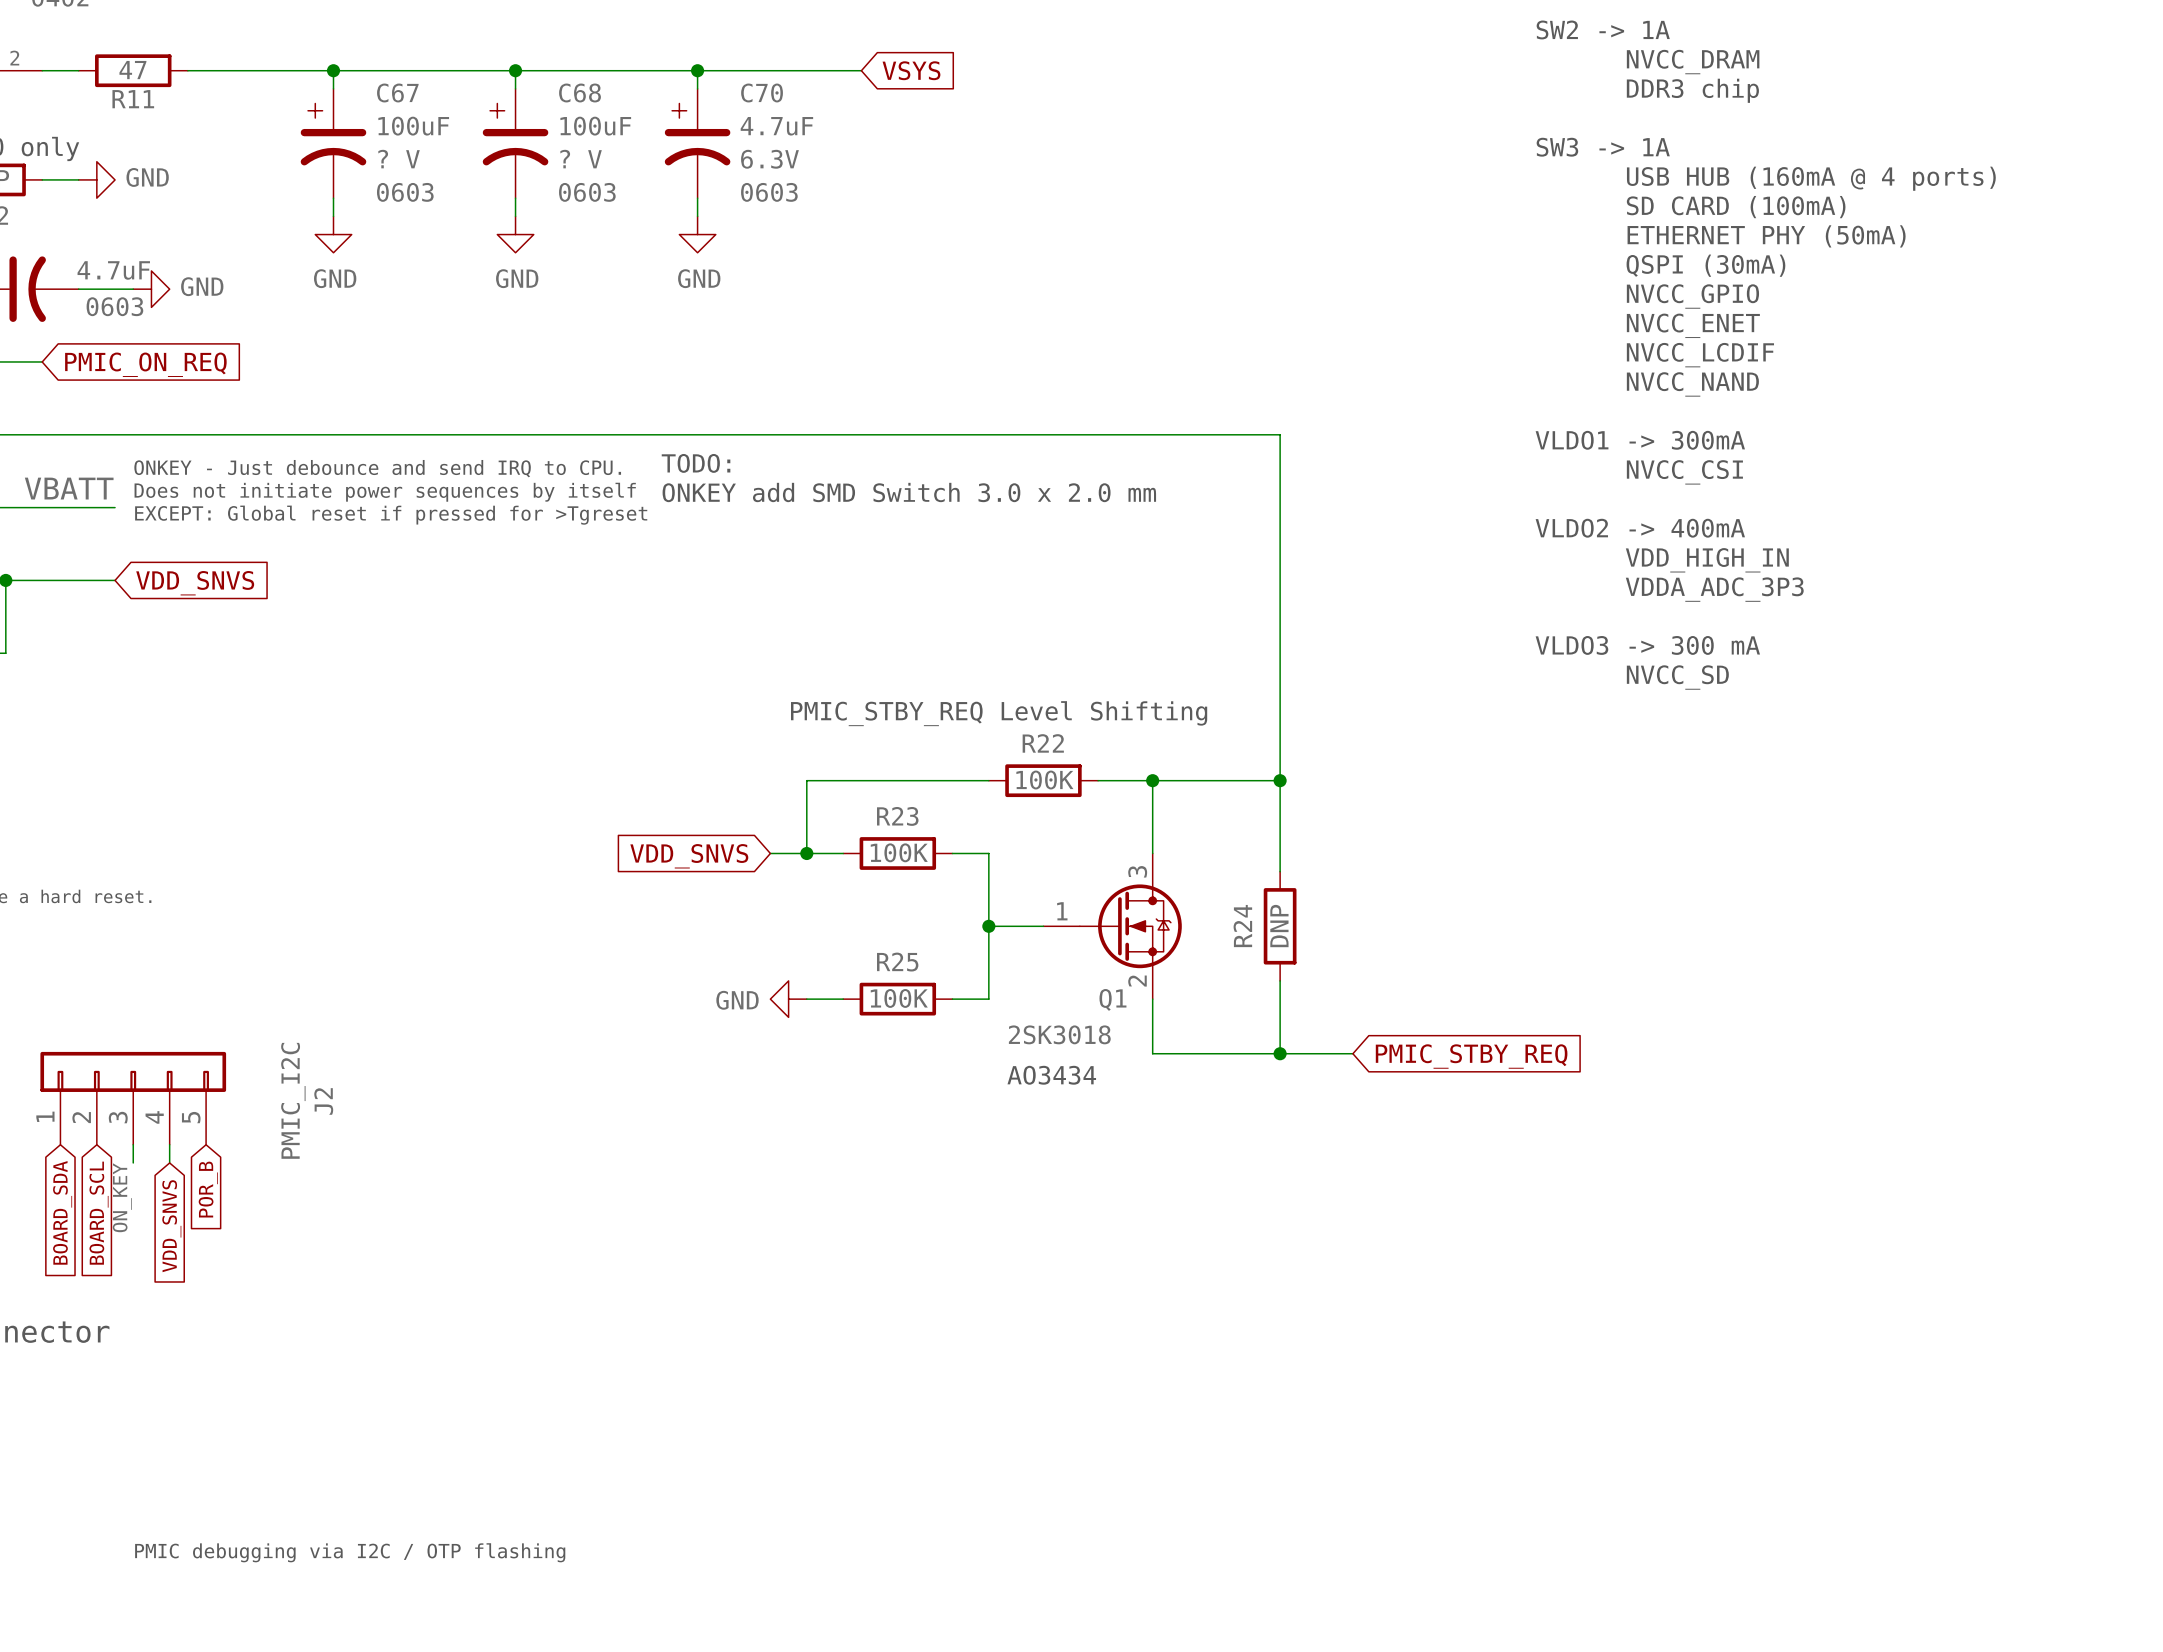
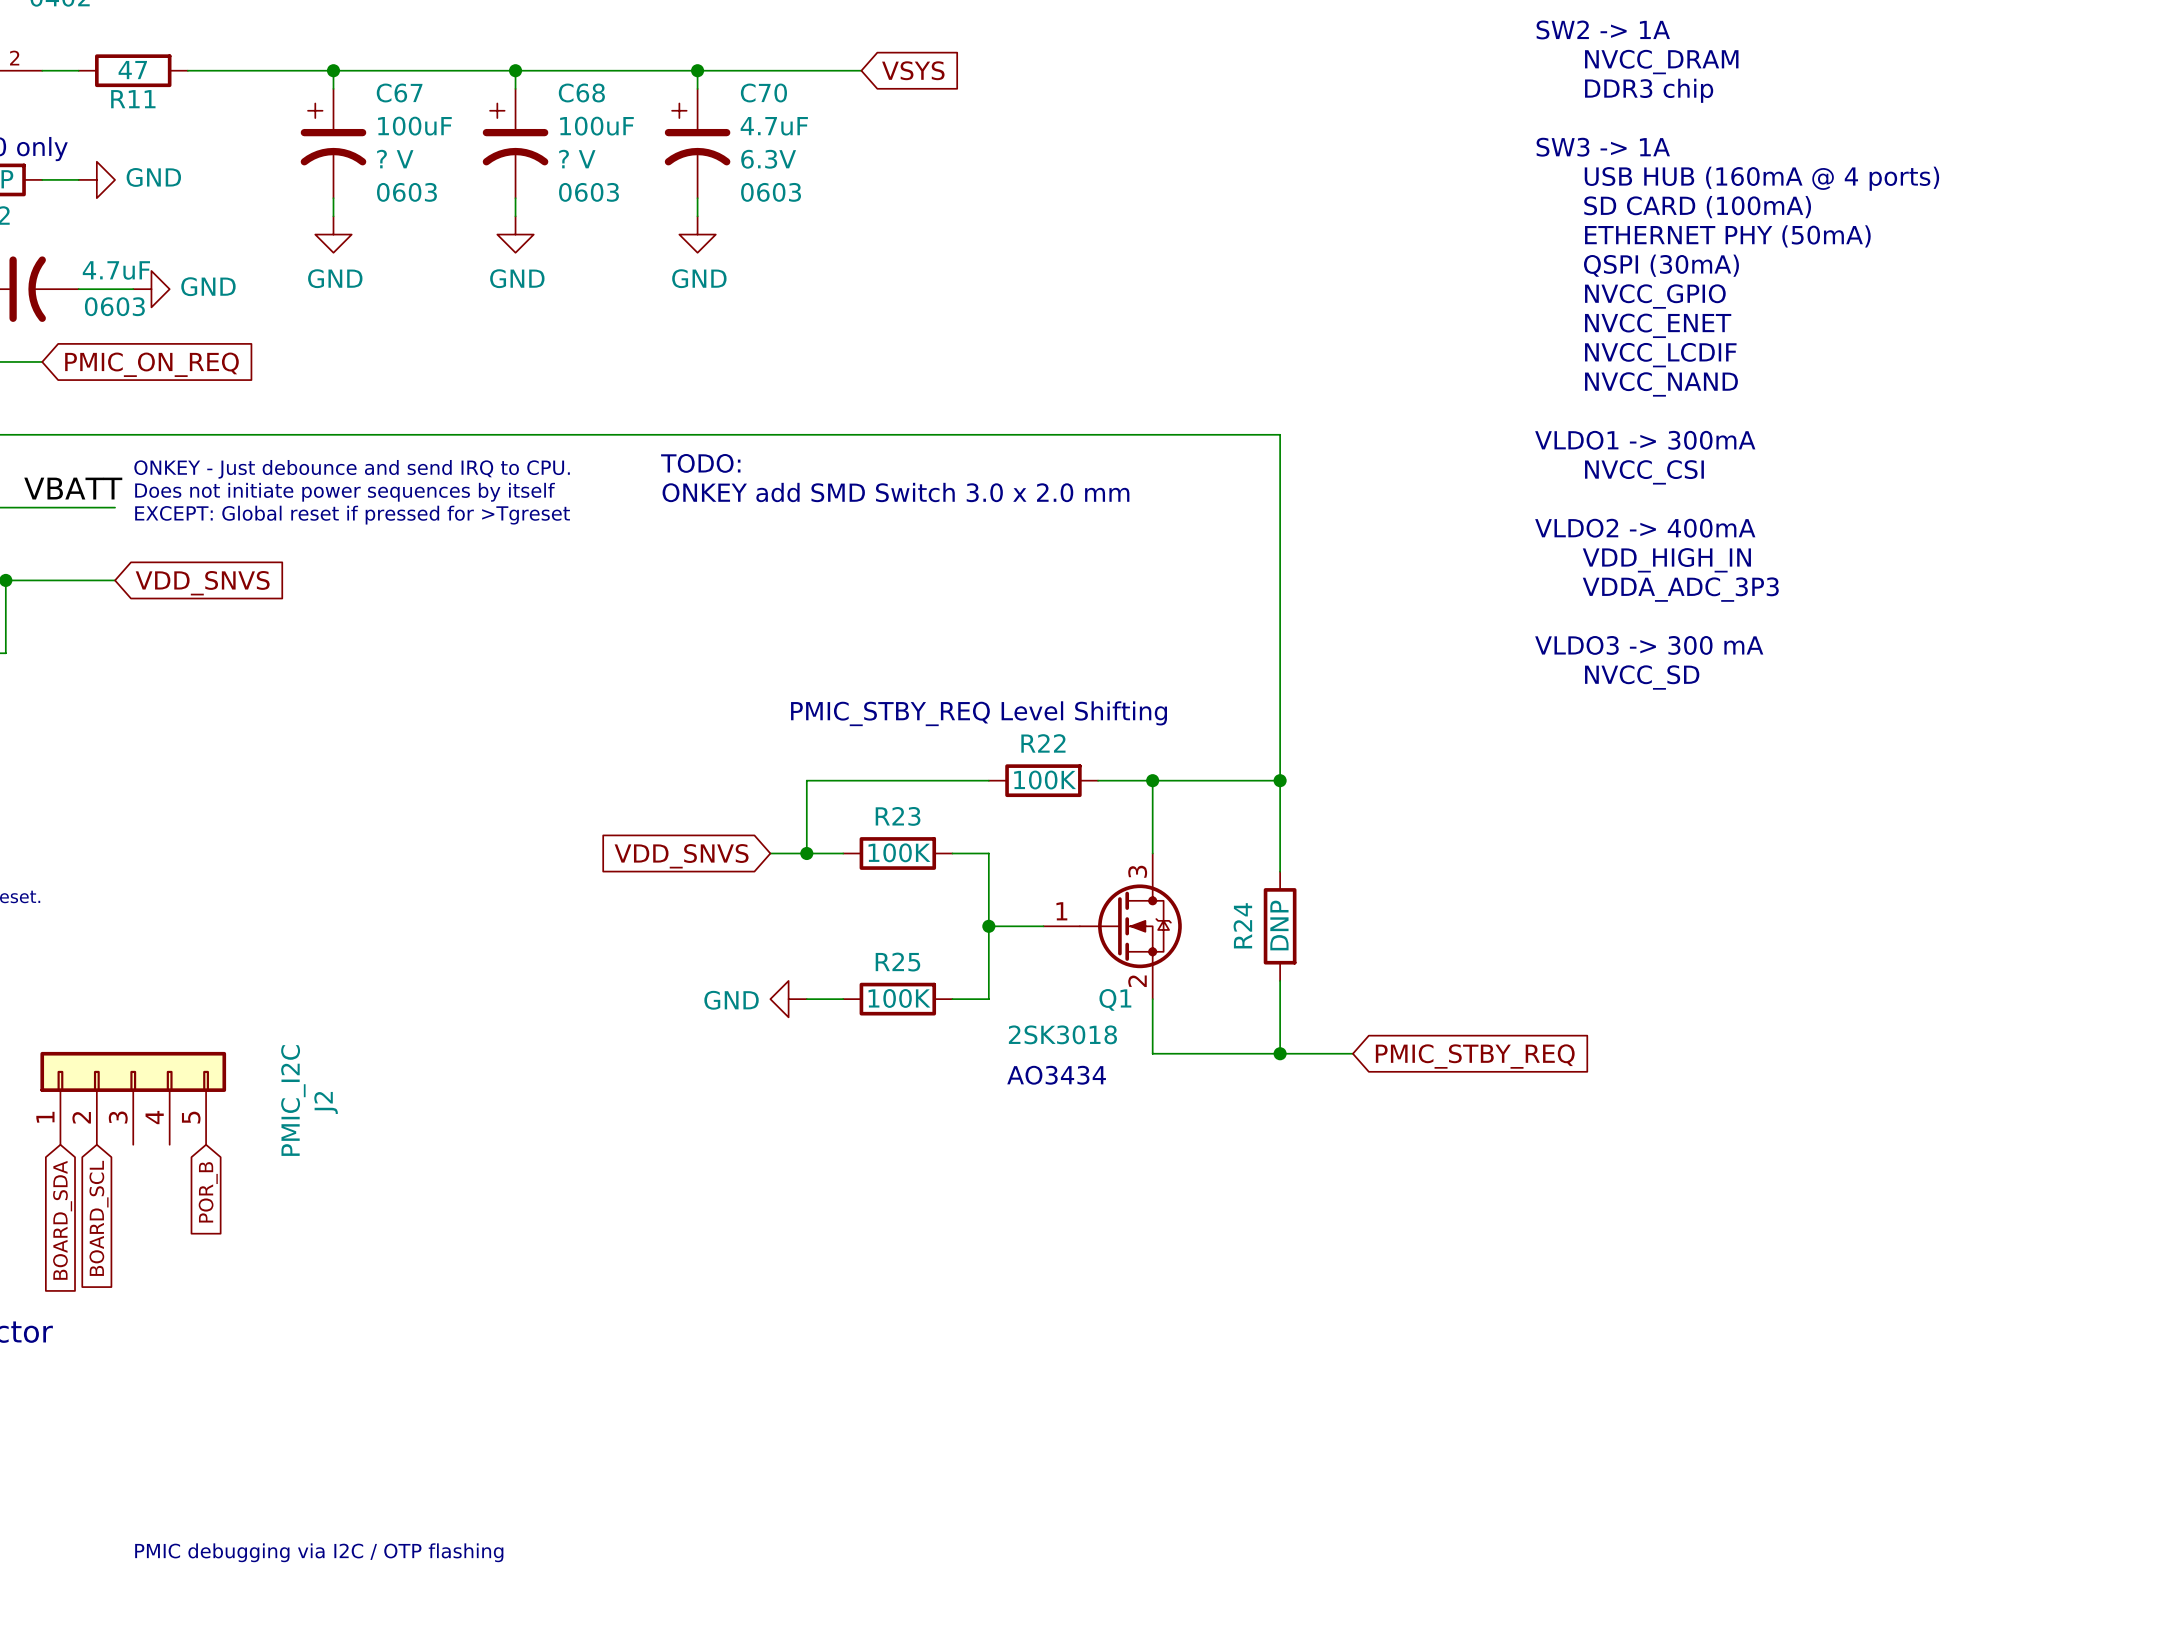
wire: (133, 1144) (133, 1162) -> none
wire: (169, 1144) (169, 1162) -> none
label: ON_KEY (122, 1197) -> none
global label: VDD_SNVS (171, 1226) -> none

